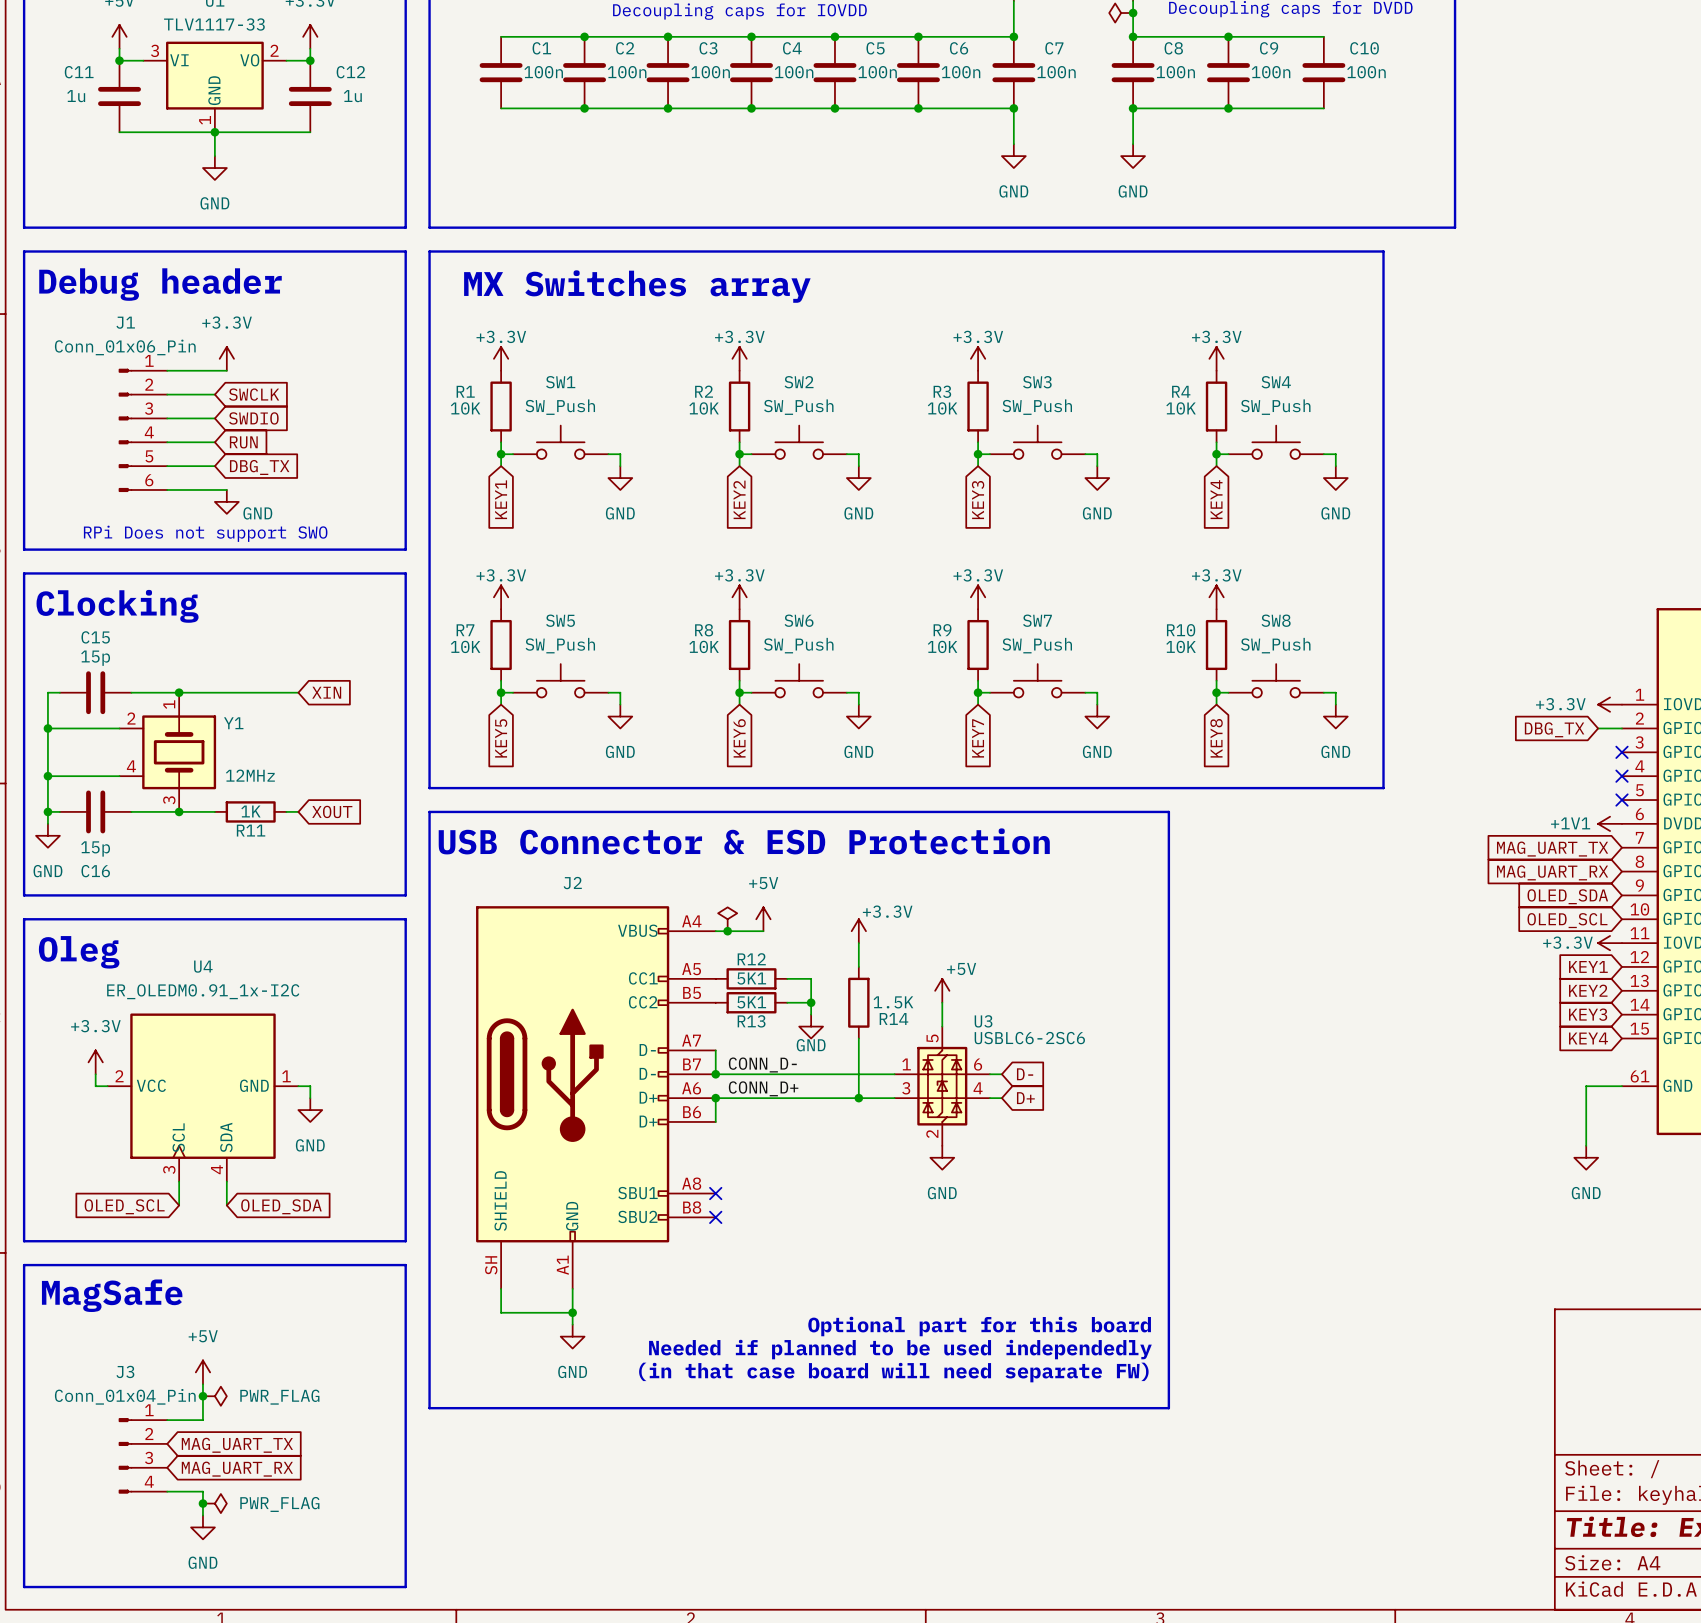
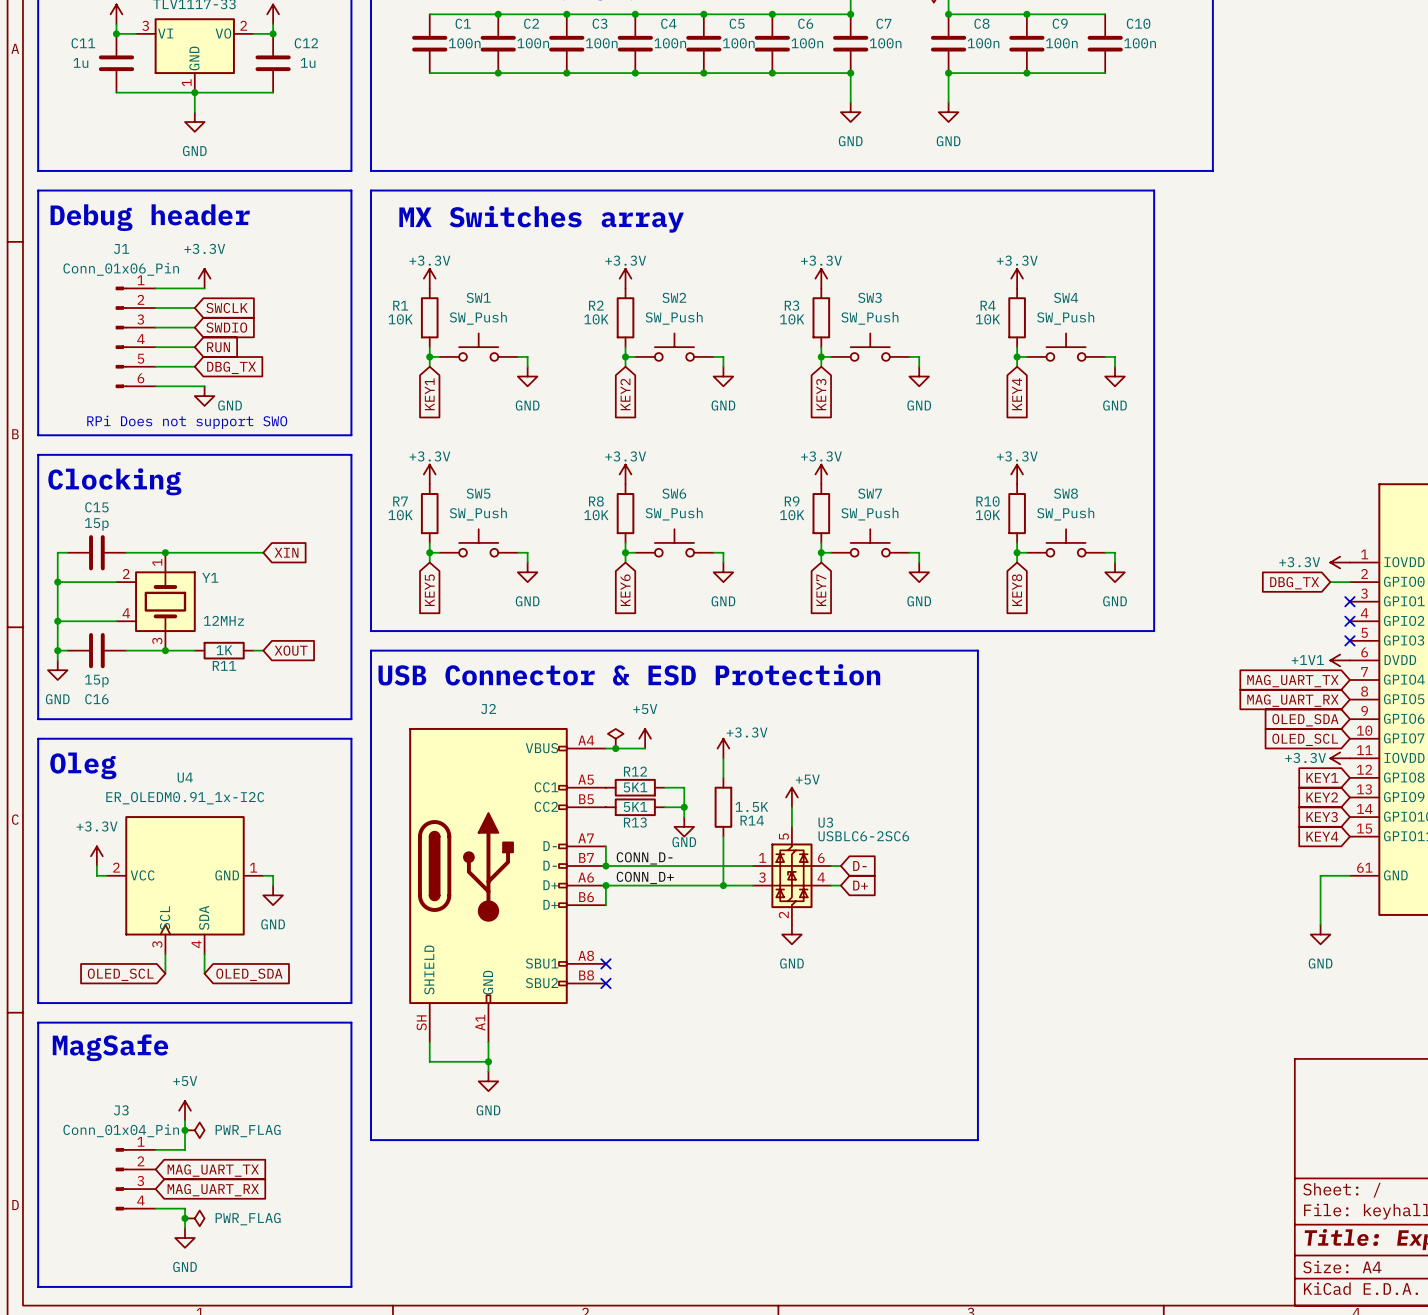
text: Optional part for this board (979, 1326) -> none
text: Needed if planned to be used independedly (900, 1349) -> none
text: (in that case board will need separate FW) (893, 1372) -> none

